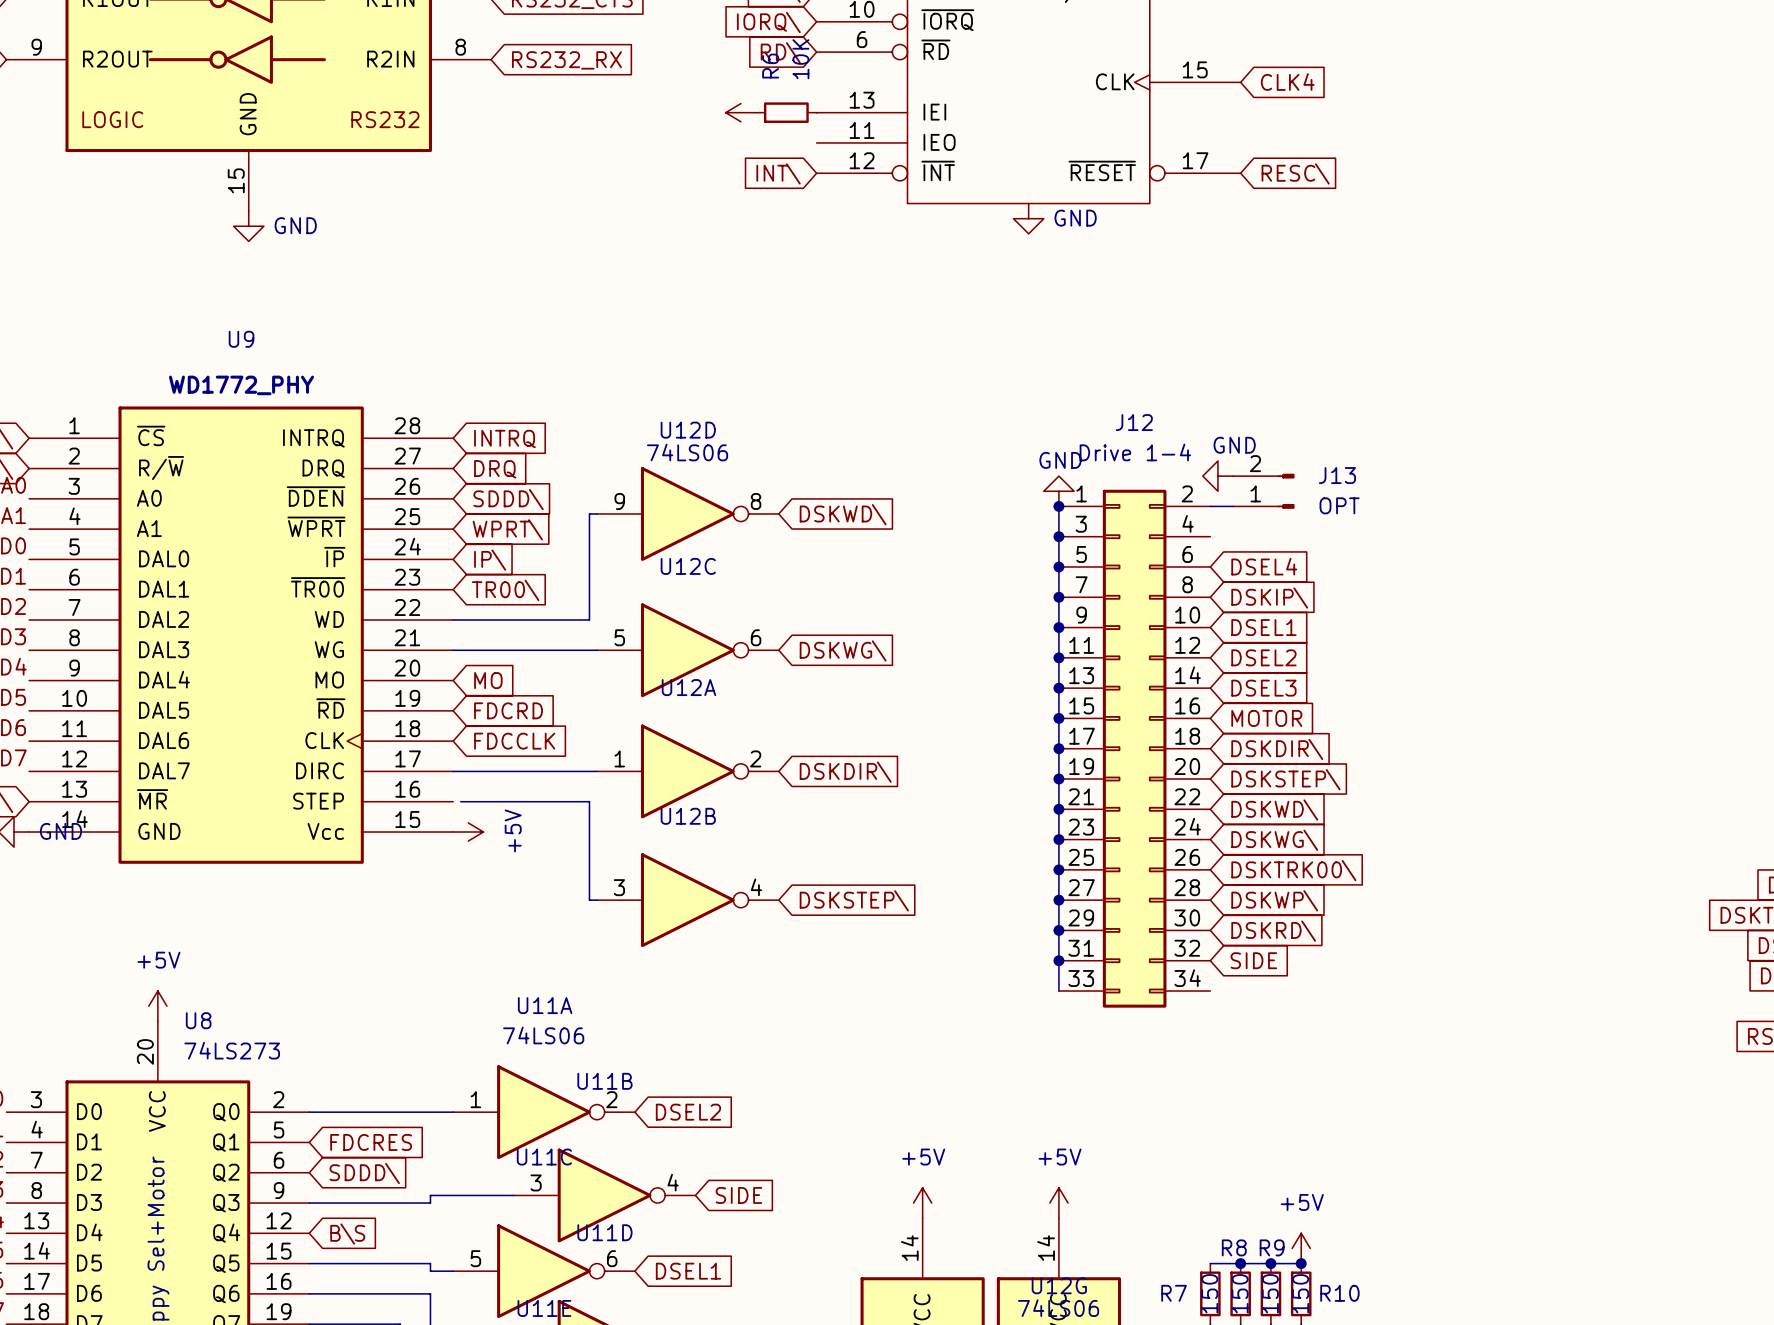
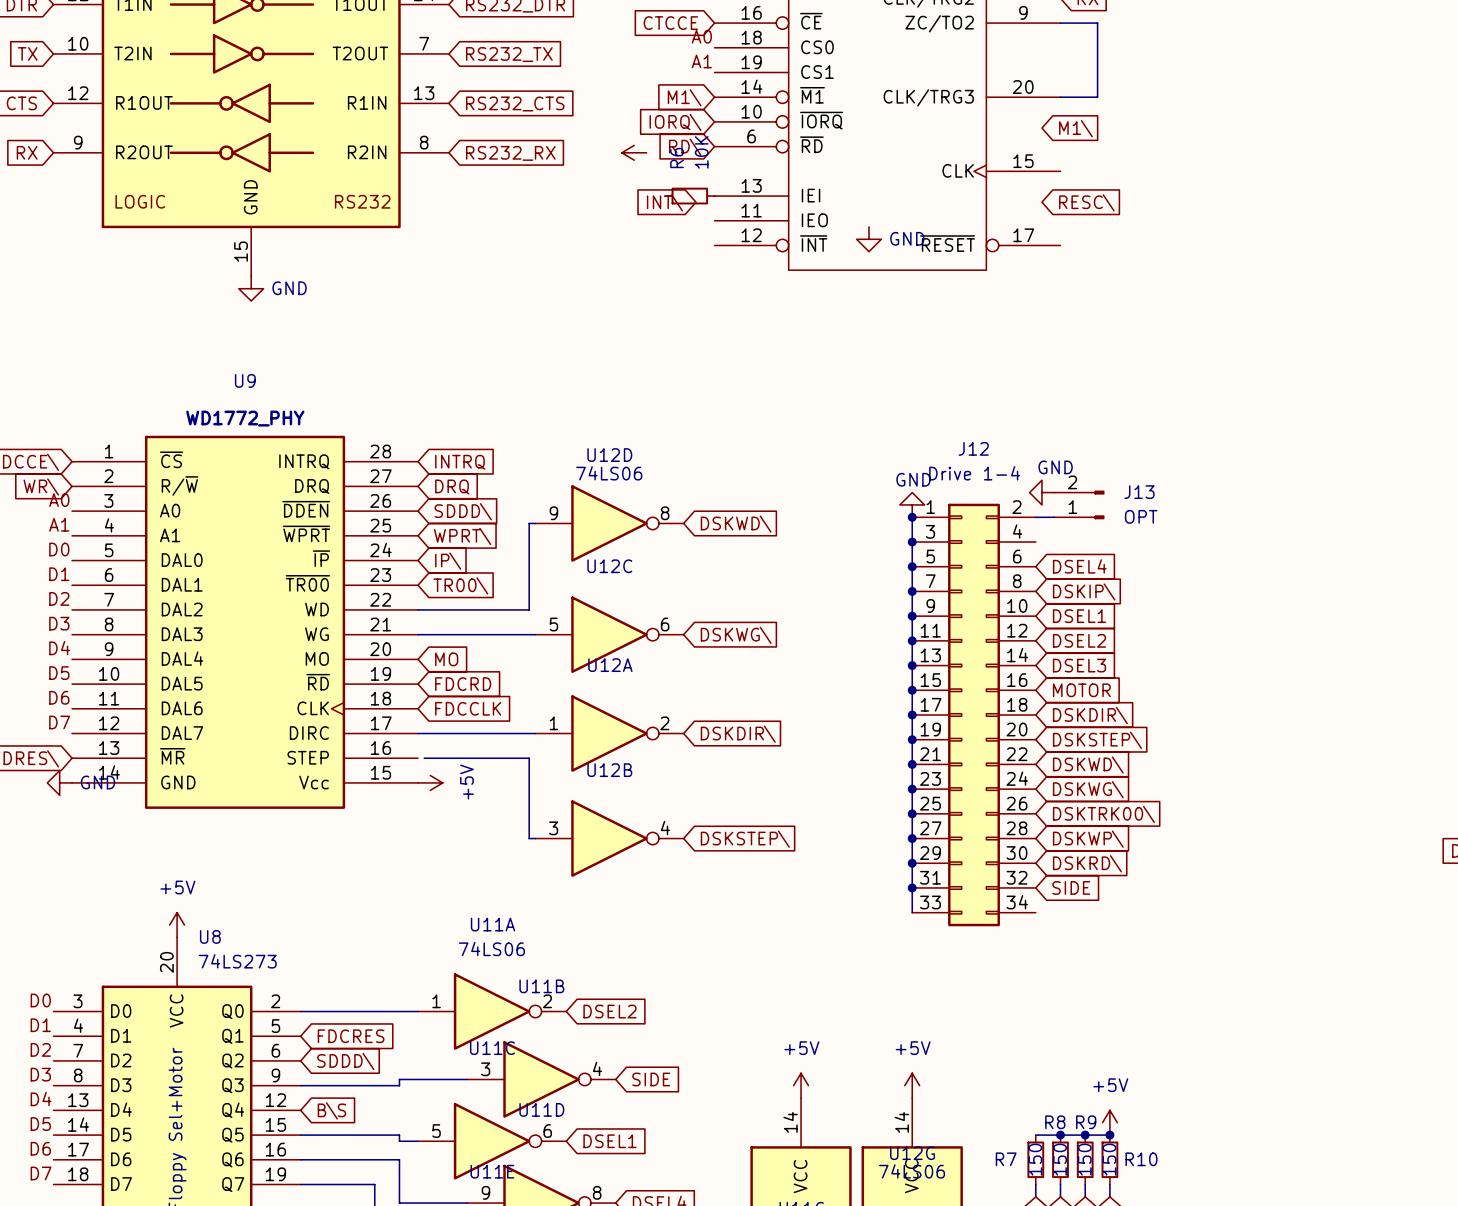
global label: none -> M1\ (1075, 128)
global label: CLK4 (1287, 82) -> none
power symbol position: (740, 112) -> (634, 152)
global label position: INT\ (778, 173) -> INT\ (664, 202)
global label position: RESC\ (1295, 173) -> RESC\ (1086, 202)
power symbol position: GND (1028, 218) -> GND (868, 239)

